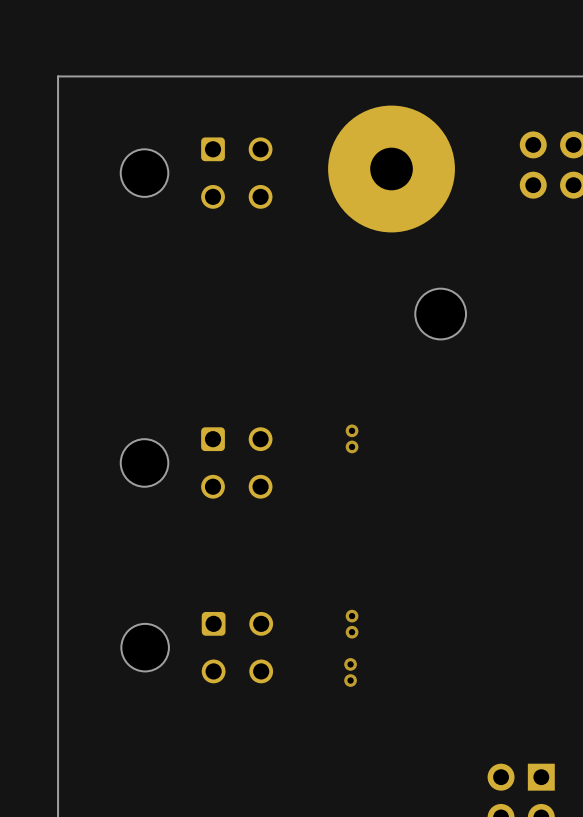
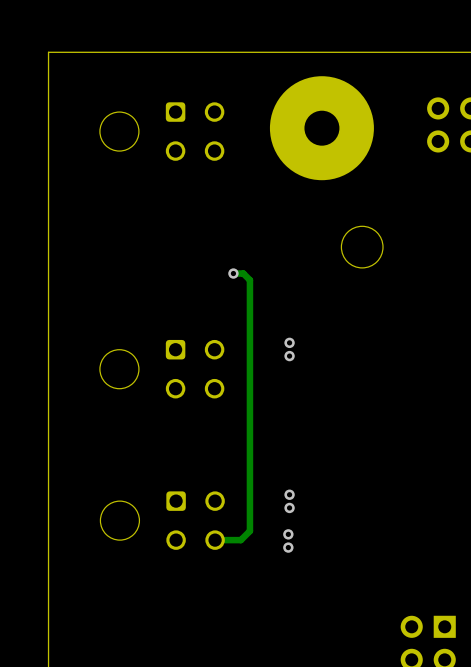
track: none -> (233, 273) (243, 273) (249, 280) (249, 531) (240, 540) (215, 540)
via: none -> (233, 273)

